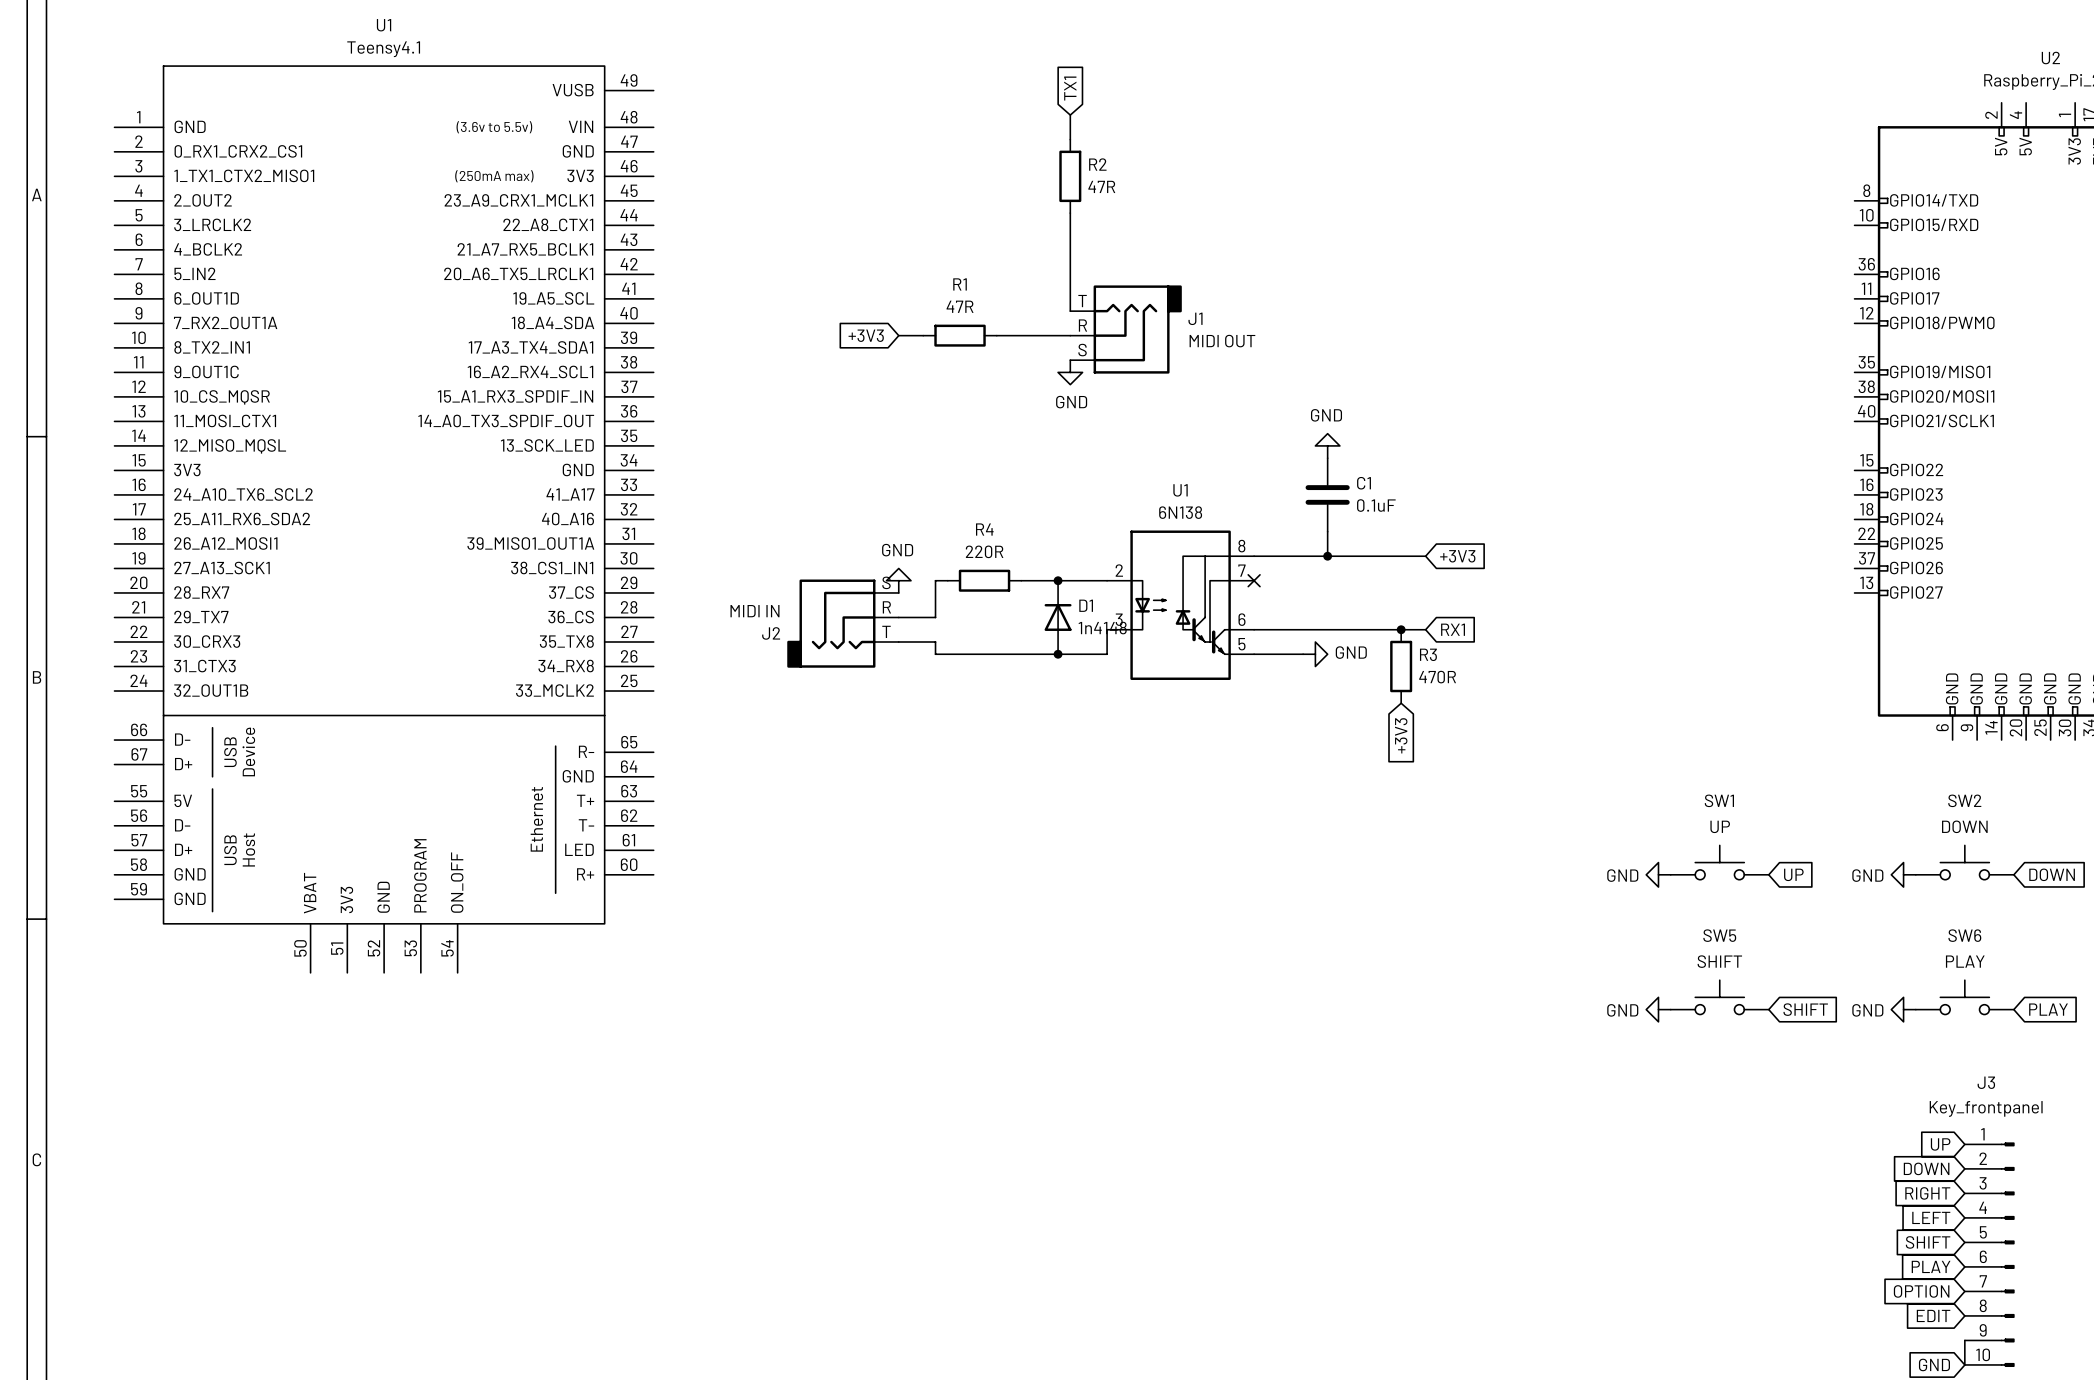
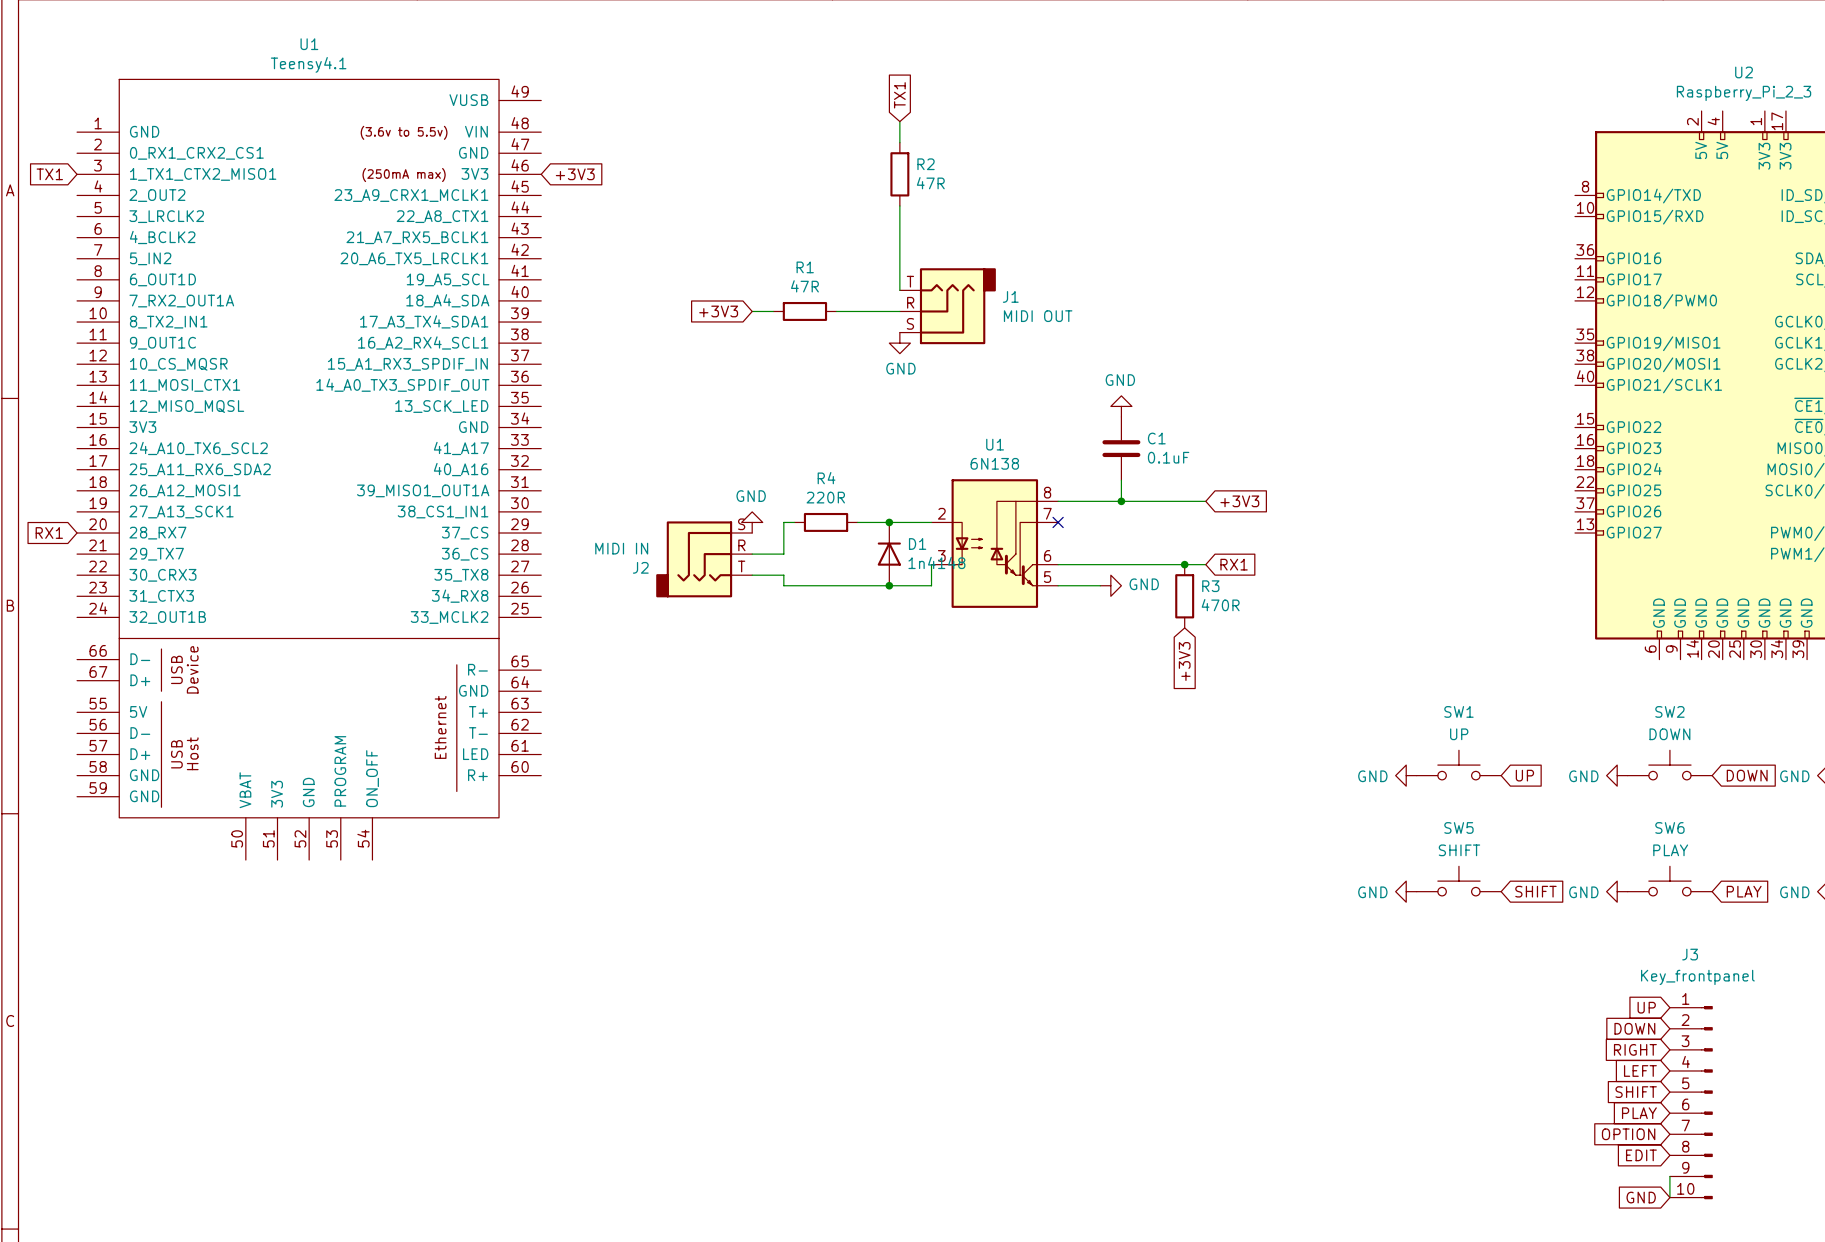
global label: none -> TX1 (49, 174)
global label: none -> +3V3 (575, 174)
global label: none -> RX1 (49, 533)

